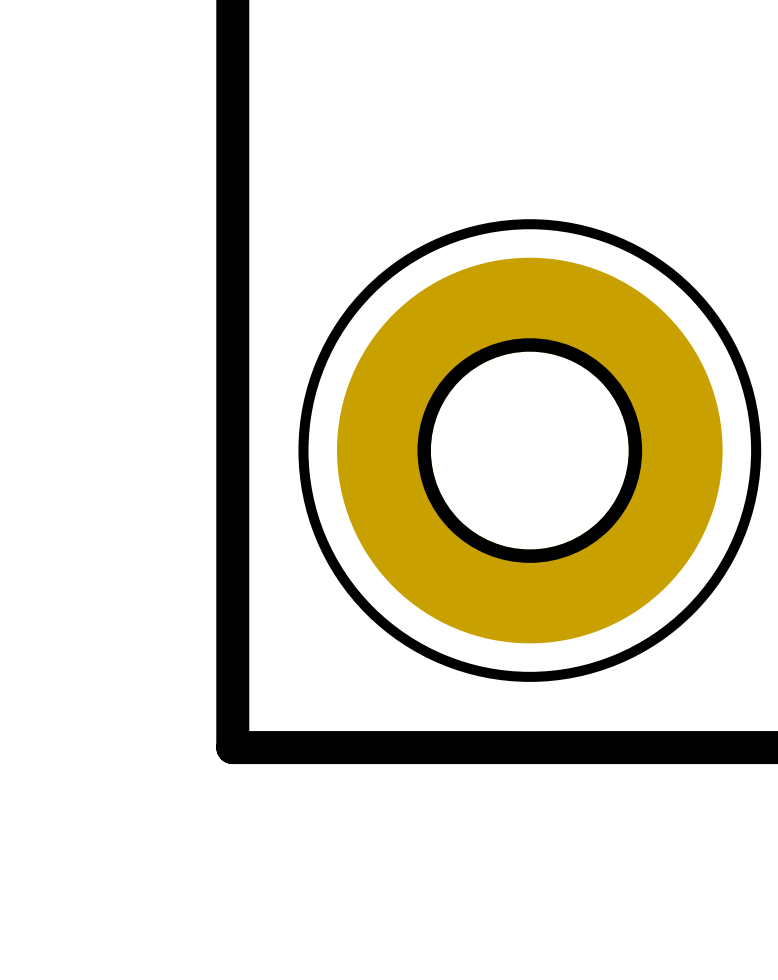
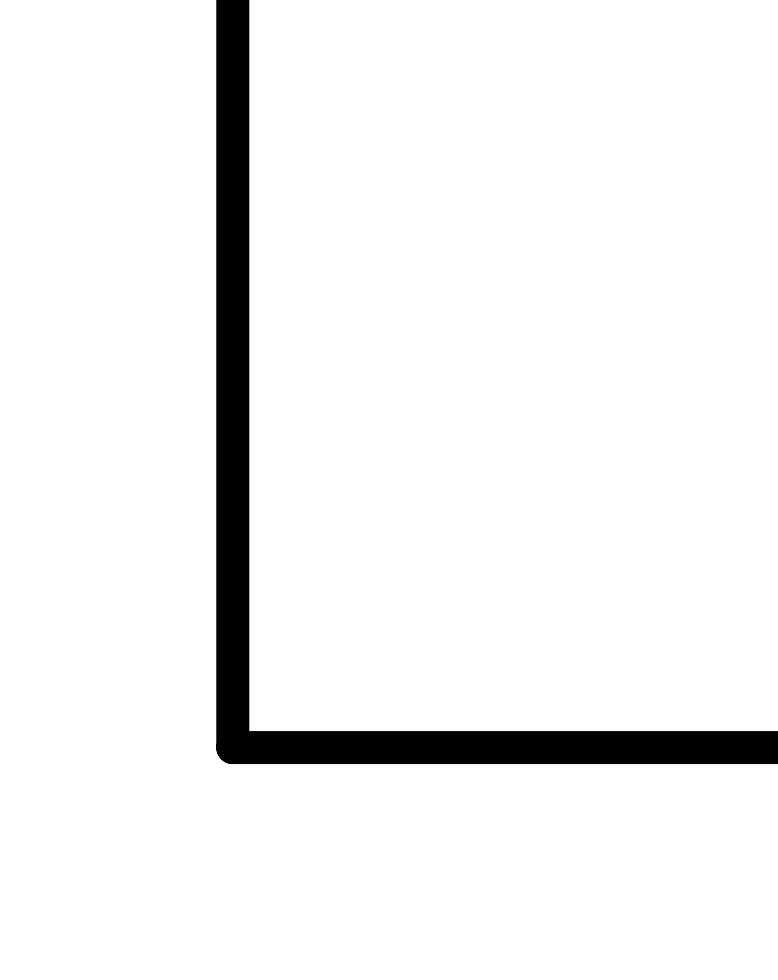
part: (529, 450) -> none

